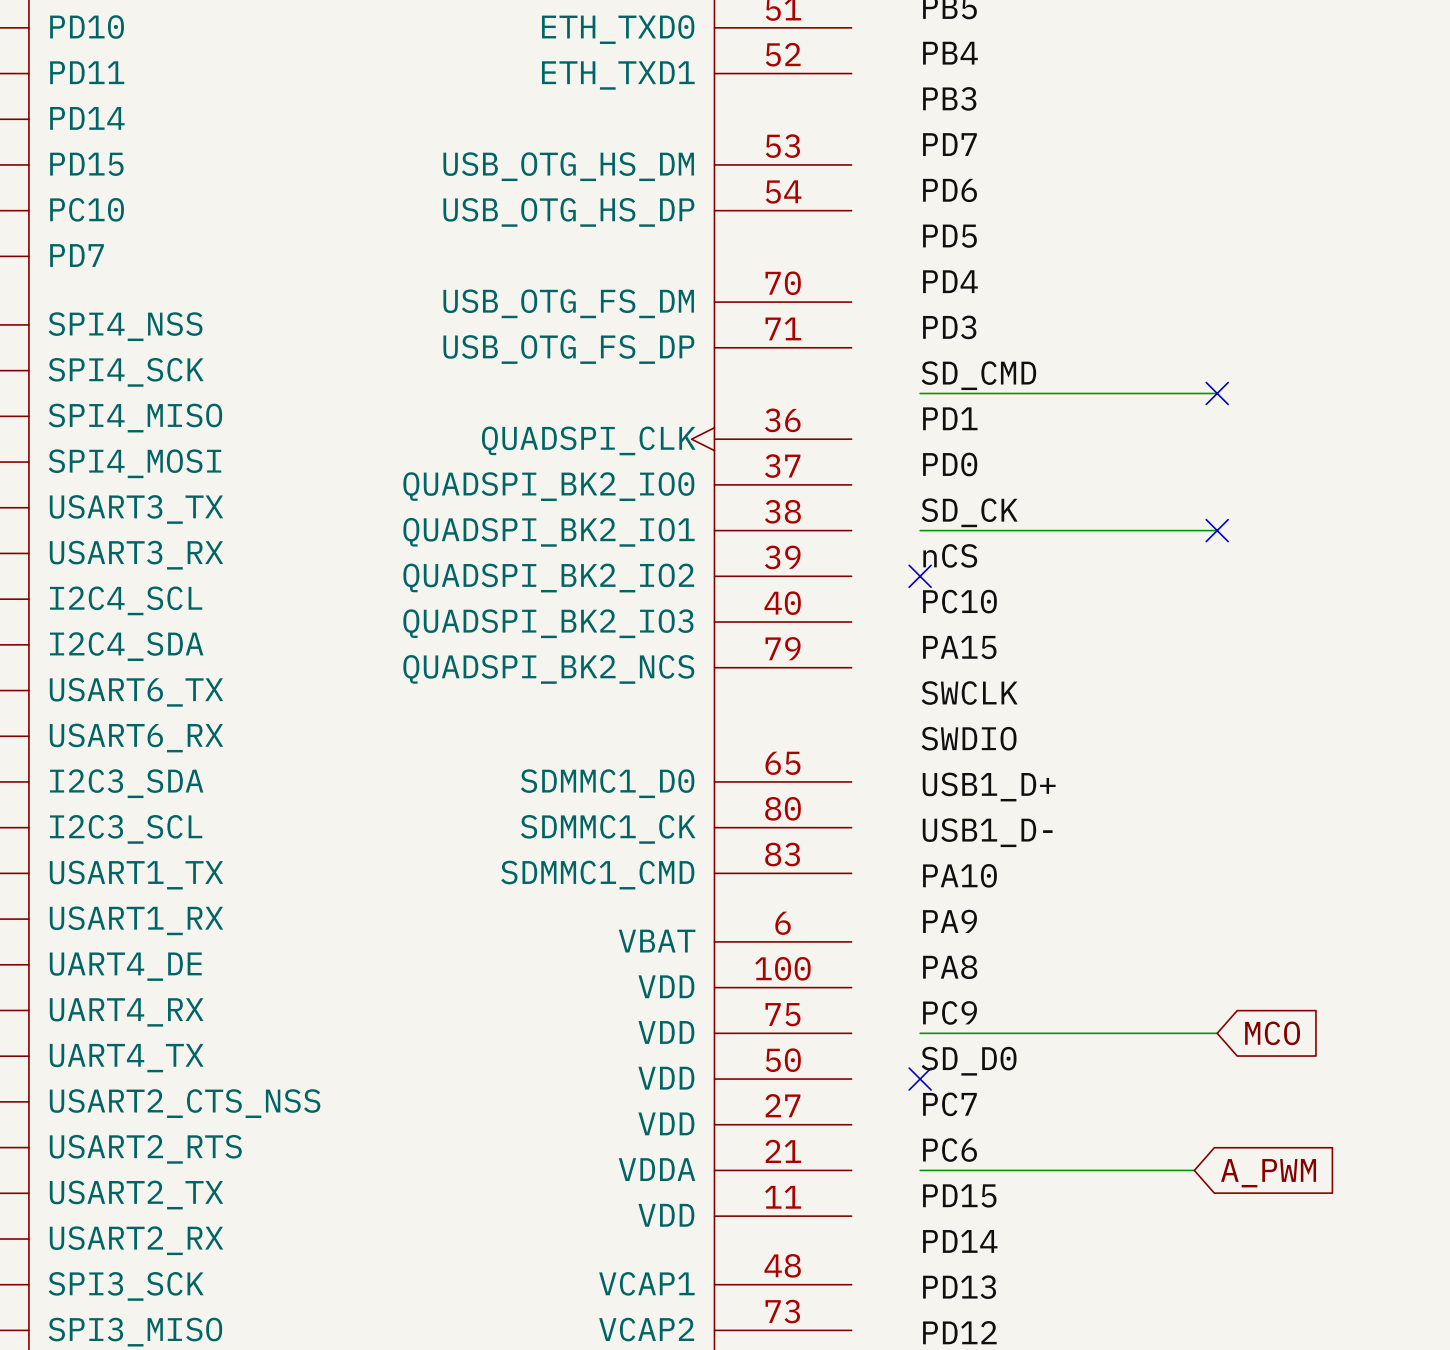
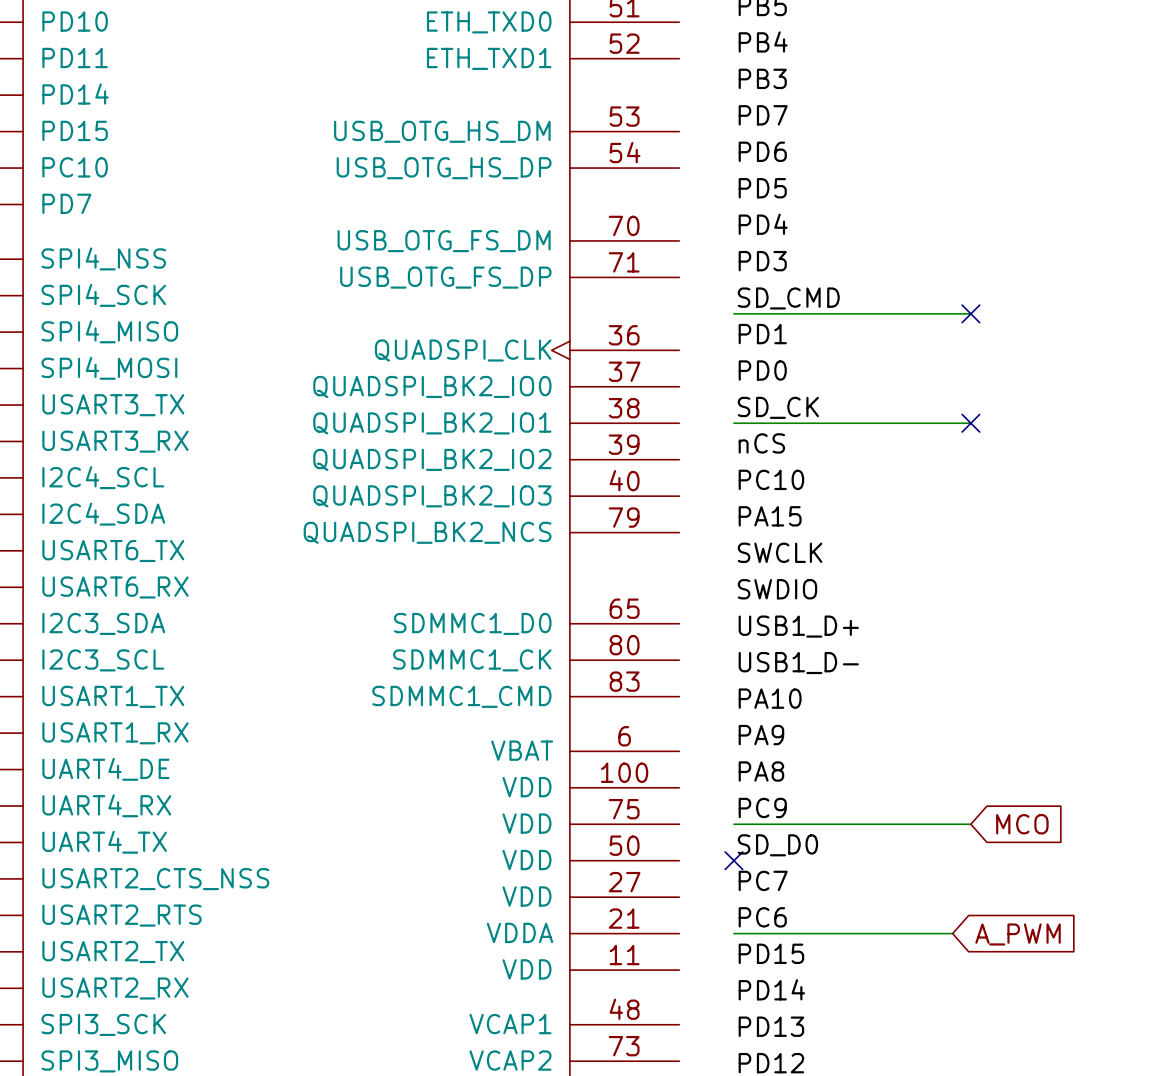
no-connect mark: (920, 576) -> none

